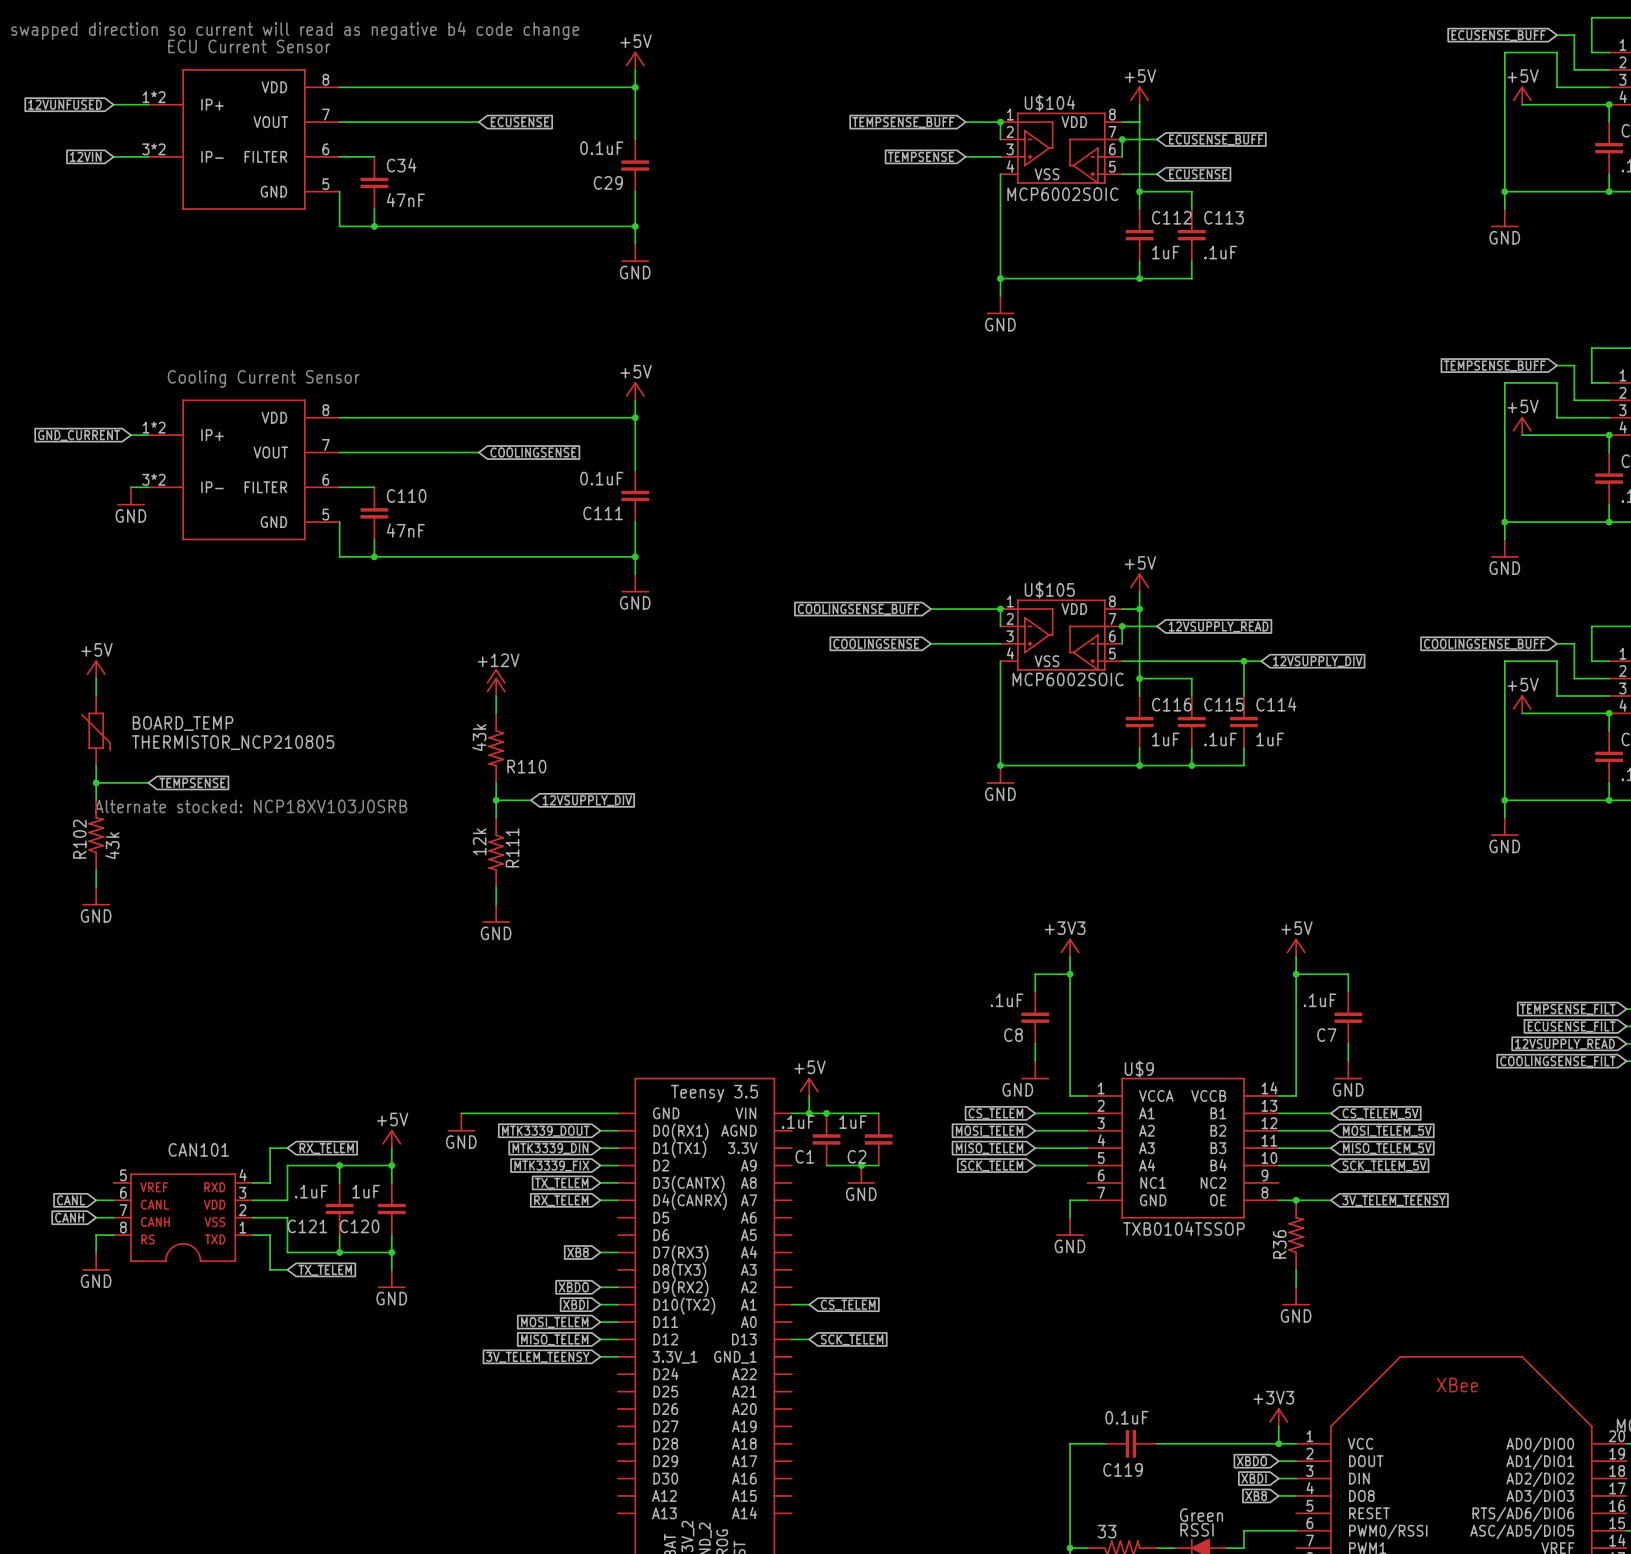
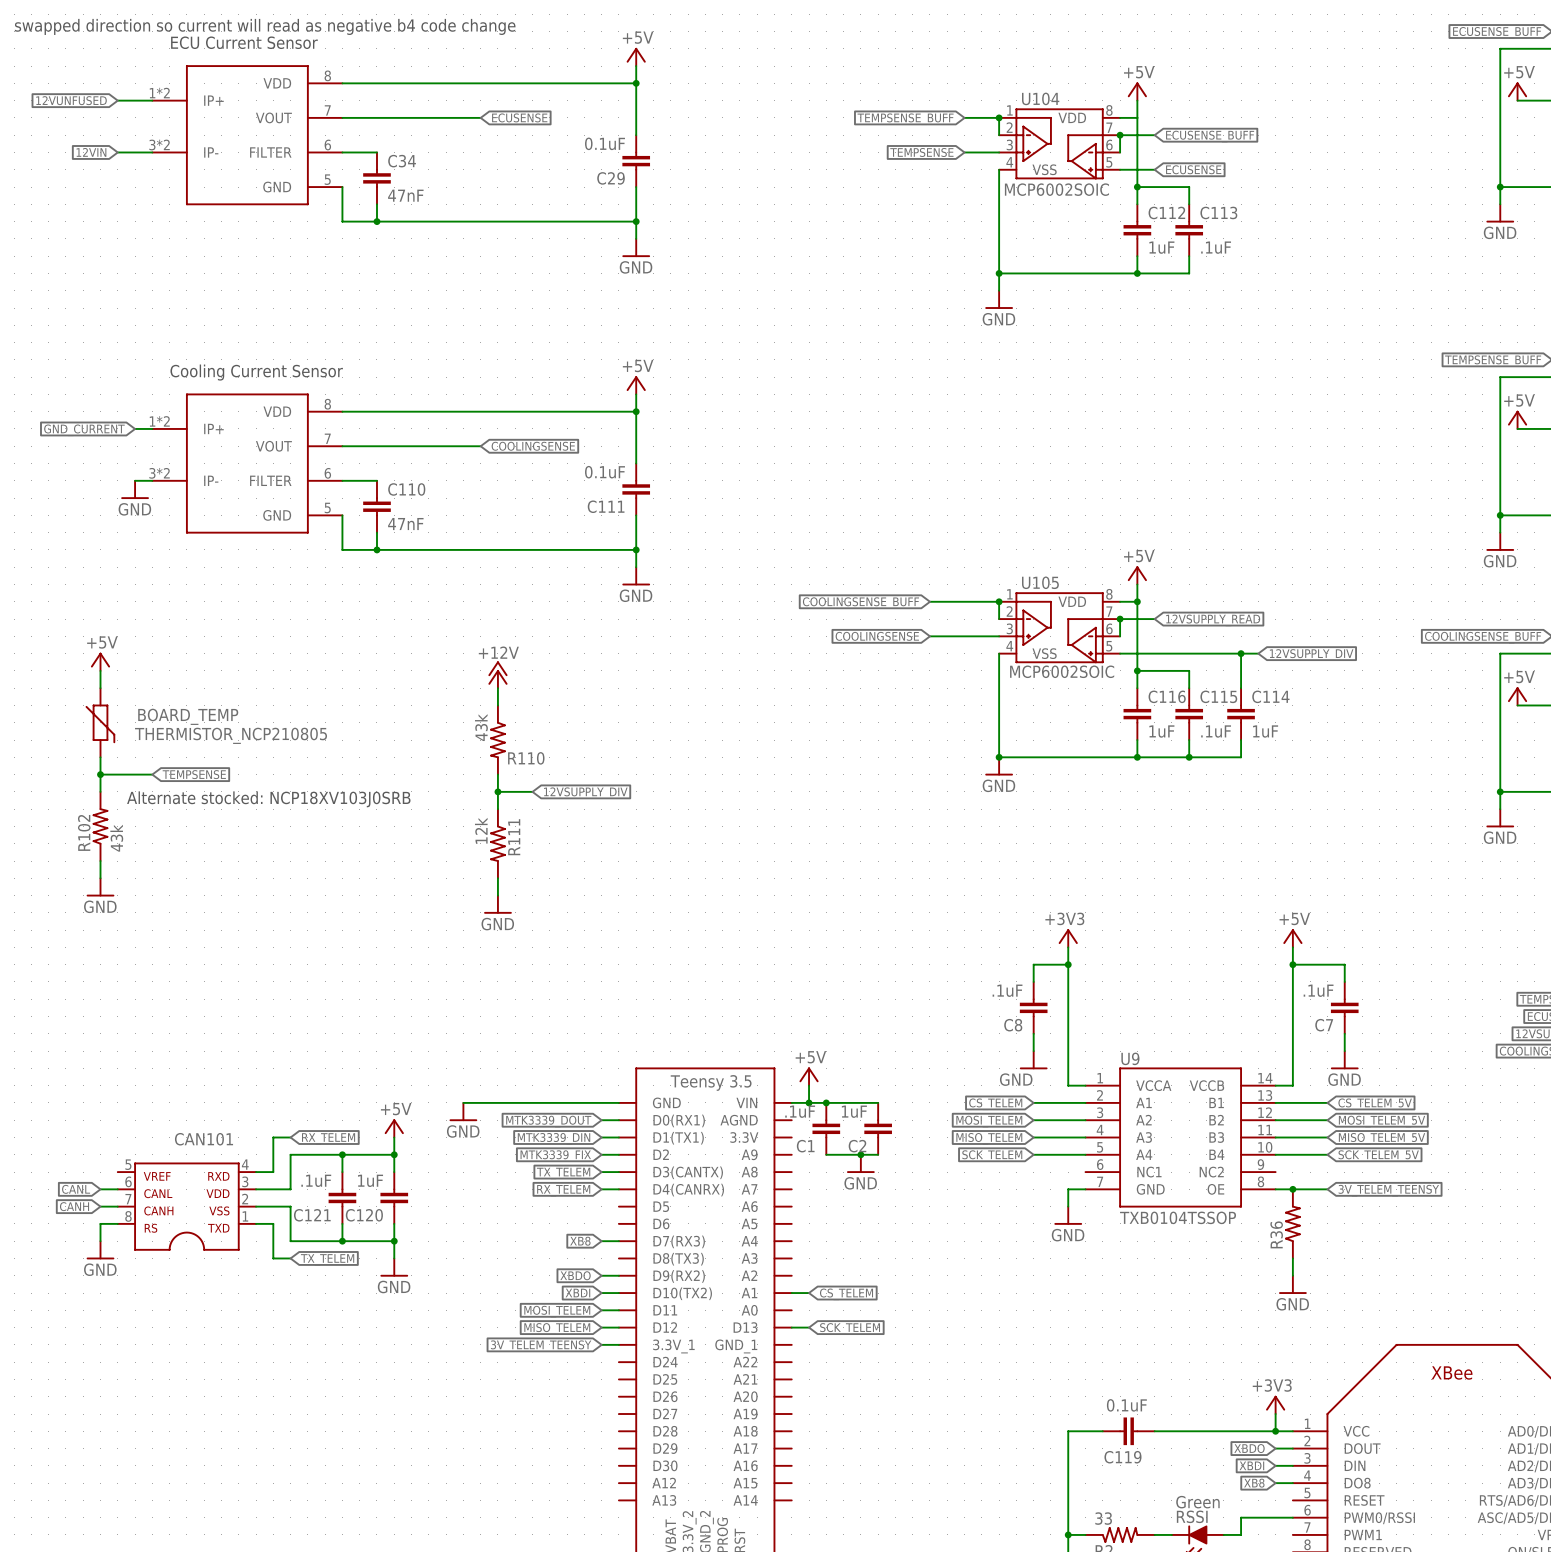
U$104 name: U$104 (1050, 102) -> U104 (1040, 98)
U$105 name: U$105 (1049, 589) -> U105 (1040, 582)
U$9 name: U$9 (1139, 1069) -> U9 (1130, 1058)

